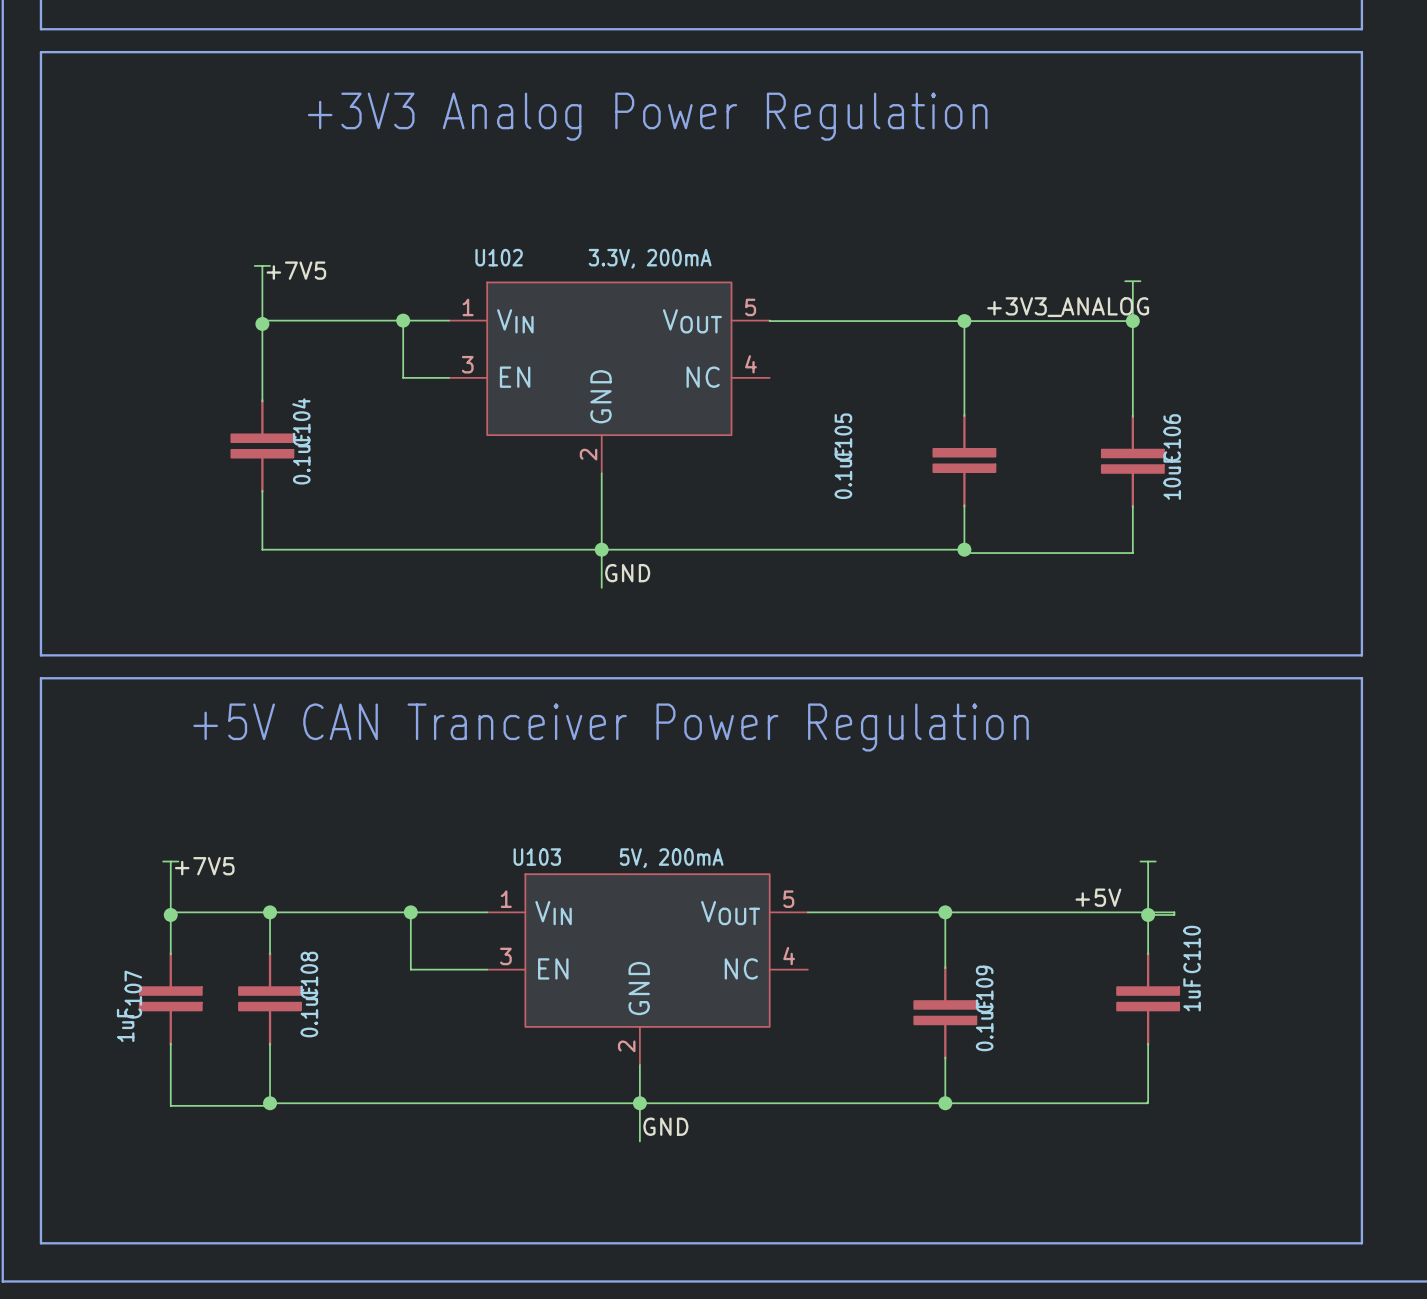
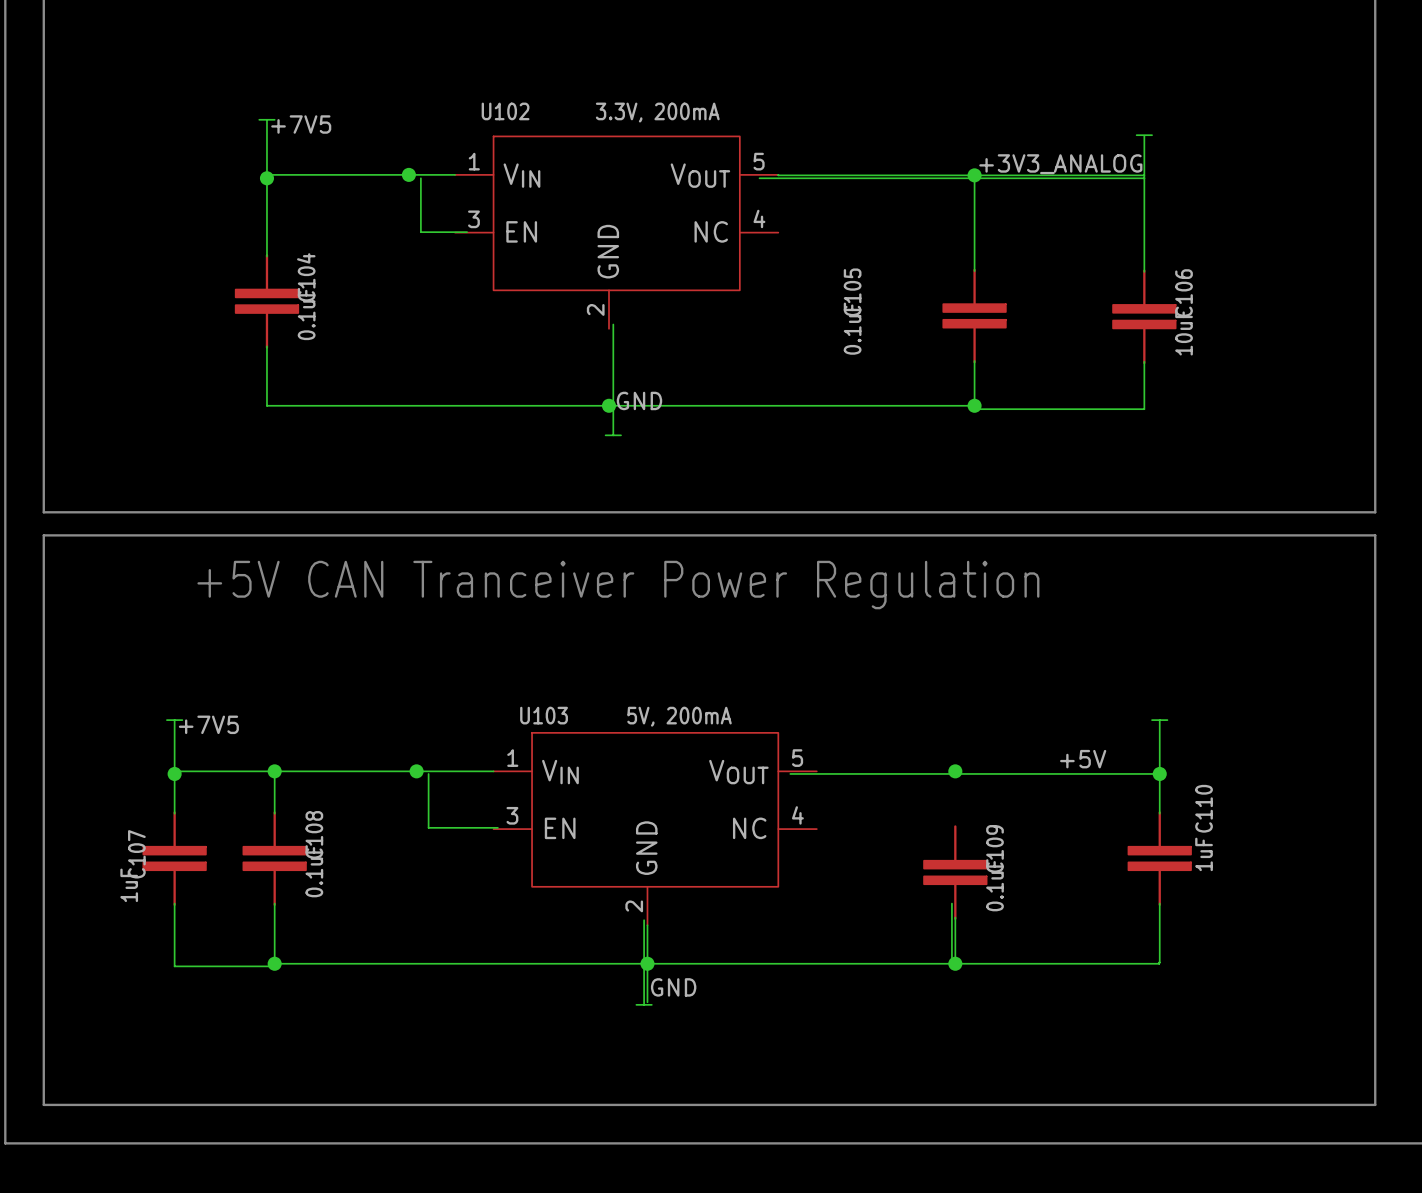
label position: +3V3_ANALOG (1068, 307) -> +3V3_ANALOG (1060, 164)
wire: (403, 320) (403, 377) (449, 377) -> none
junction: (1132, 321) -> none
wire: none -> (420, 178) (420, 232) (467, 232)
wire: none -> (759, 178) (1144, 178)
wire: none -> (613, 324) (613, 435)
wire: (601, 473) (601, 587) -> none
label position: GND (627, 573) -> GND (639, 400)
wire: none -> (605, 435) (621, 435)
label position: +5V (1098, 897) -> +5V (1083, 759)
wire: (410, 912) (410, 969) (487, 969) -> none
wire: (807, 912) (1174, 912) (1174, 914) (1148, 914) -> (790, 773) (1159, 773)
wire: (945, 912) (945, 968) -> none
wire: none -> (428, 773) (428, 827) (497, 827)
wire: none -> (951, 903) (951, 966)
wire: none -> (644, 920) (644, 1004)
wire: none -> (636, 1004) (651, 1004)

